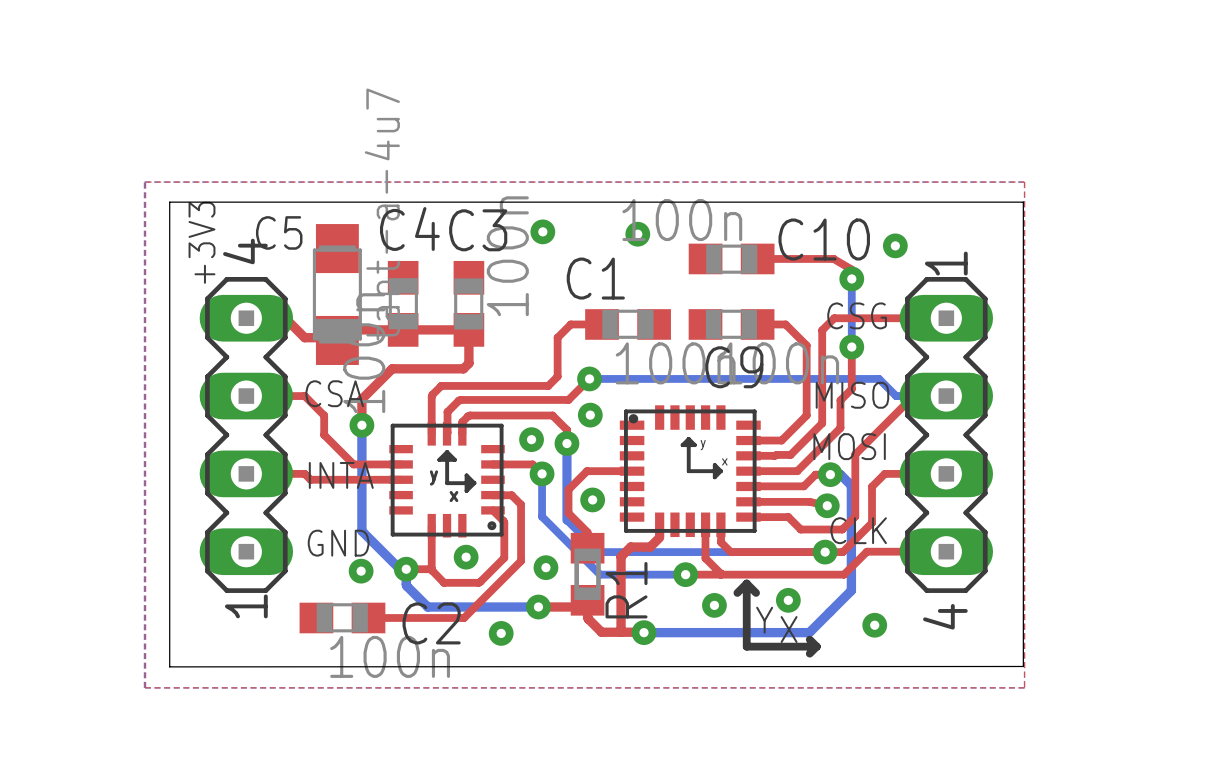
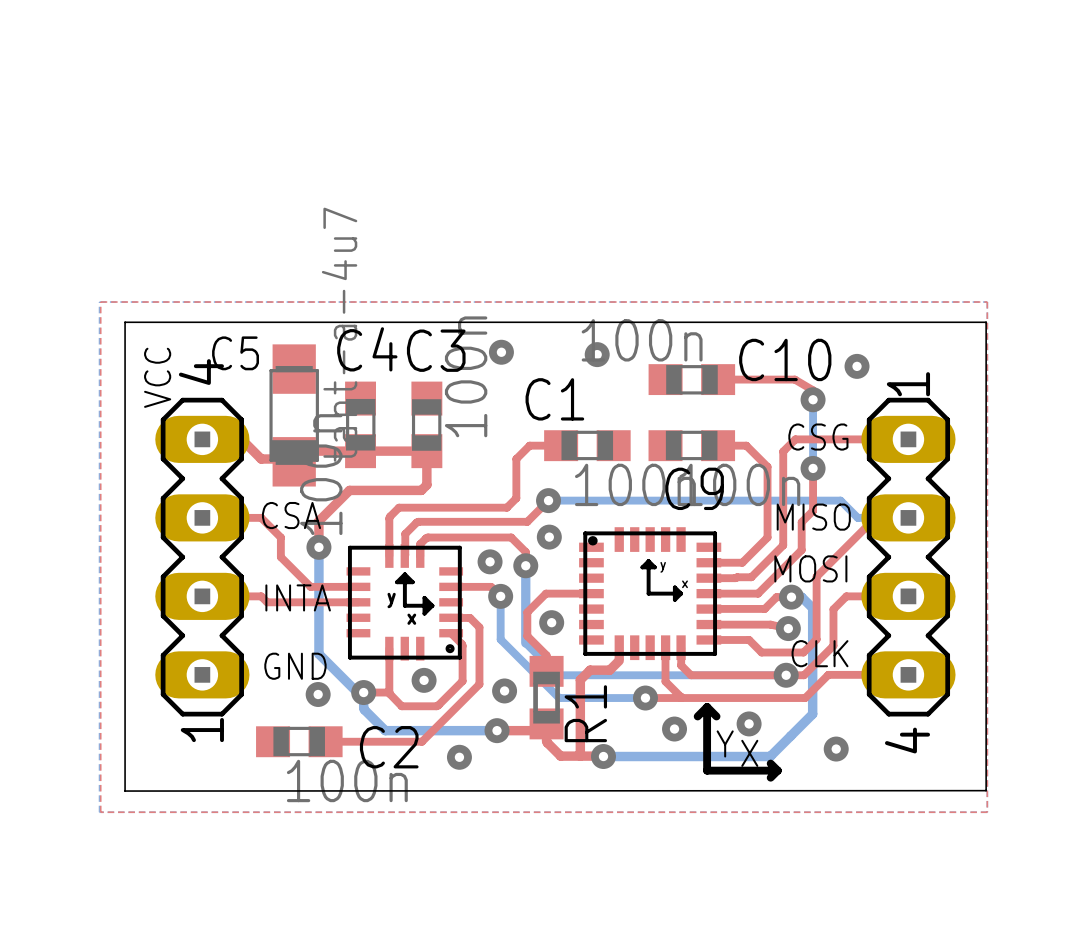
text: +3V3 (201, 242) -> VCC (157, 377)

